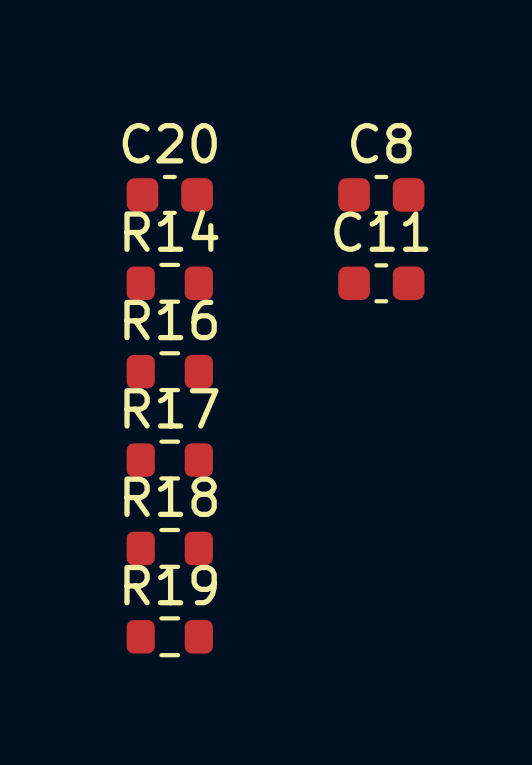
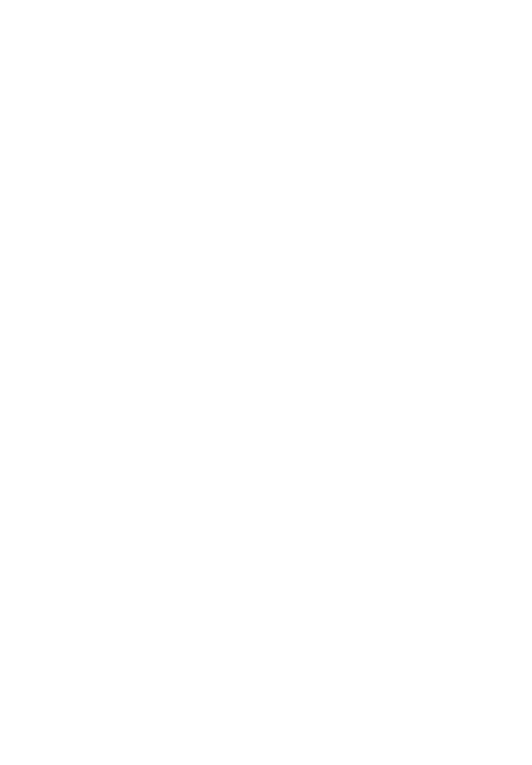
C20: (169, 194) -> none
C8: (381, 194) -> none
R14: (169, 283) -> none
C11: (381, 283) -> none
R16: (169, 371) -> none
R17: (169, 460) -> none
R18: (169, 548) -> none
R19: (169, 636) -> none

